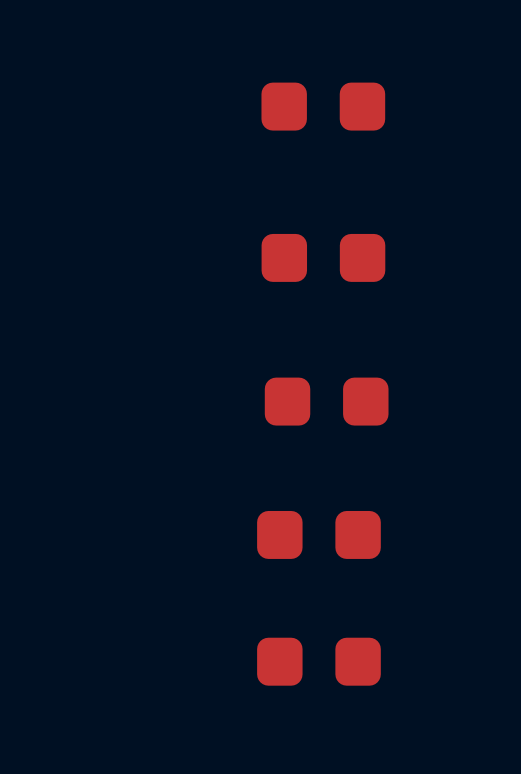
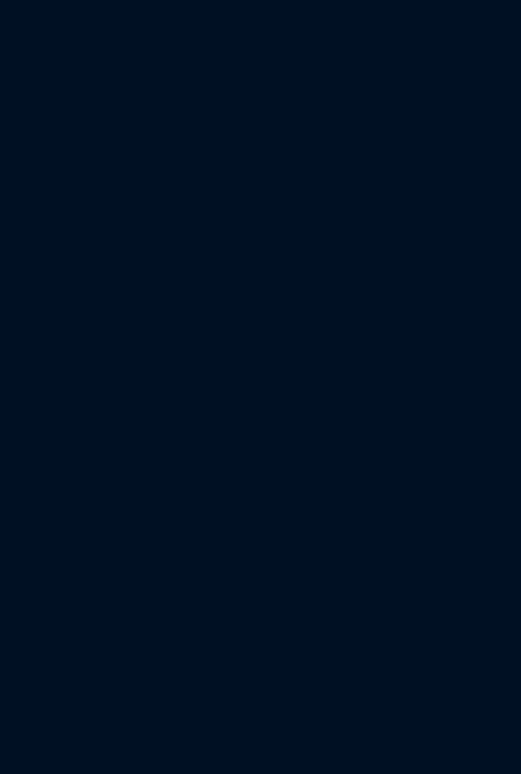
part: (323, 106) -> none
part: (323, 257) -> none
part: (326, 401) -> none
part: (318, 534) -> none
part: (318, 661) -> none

